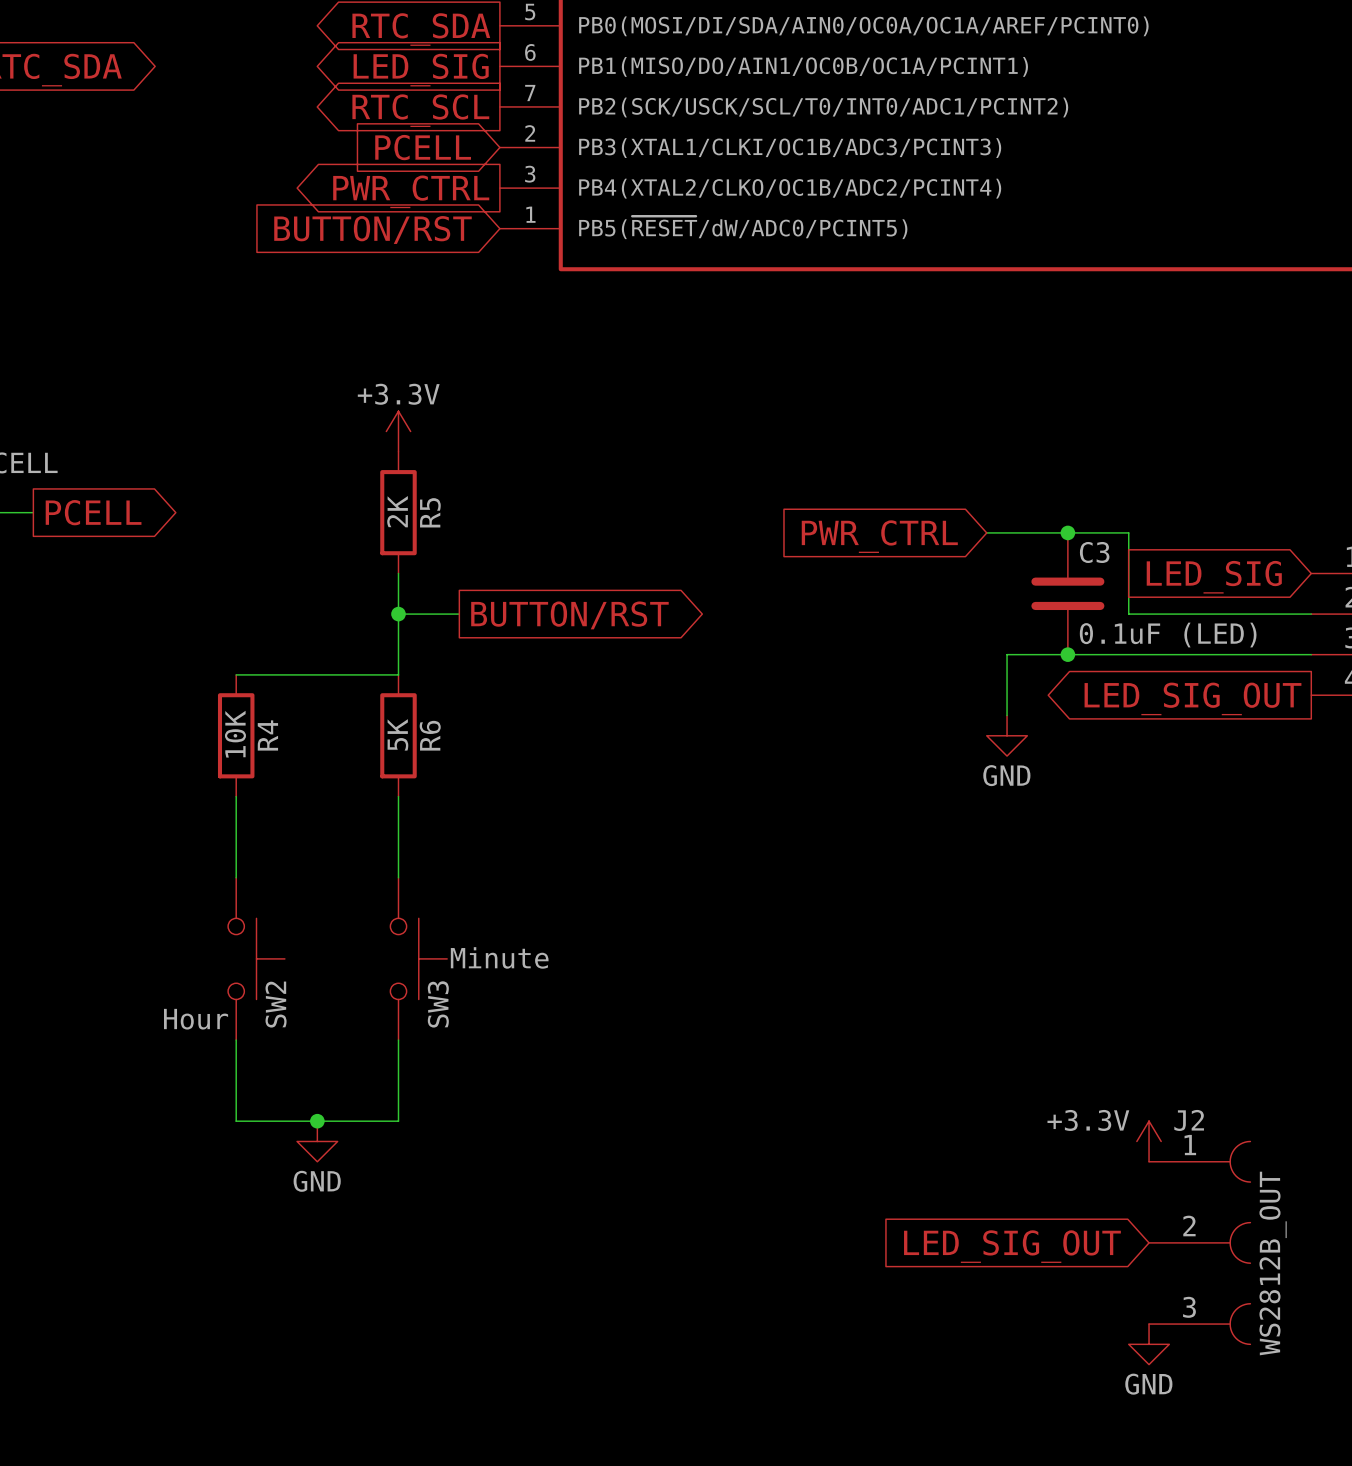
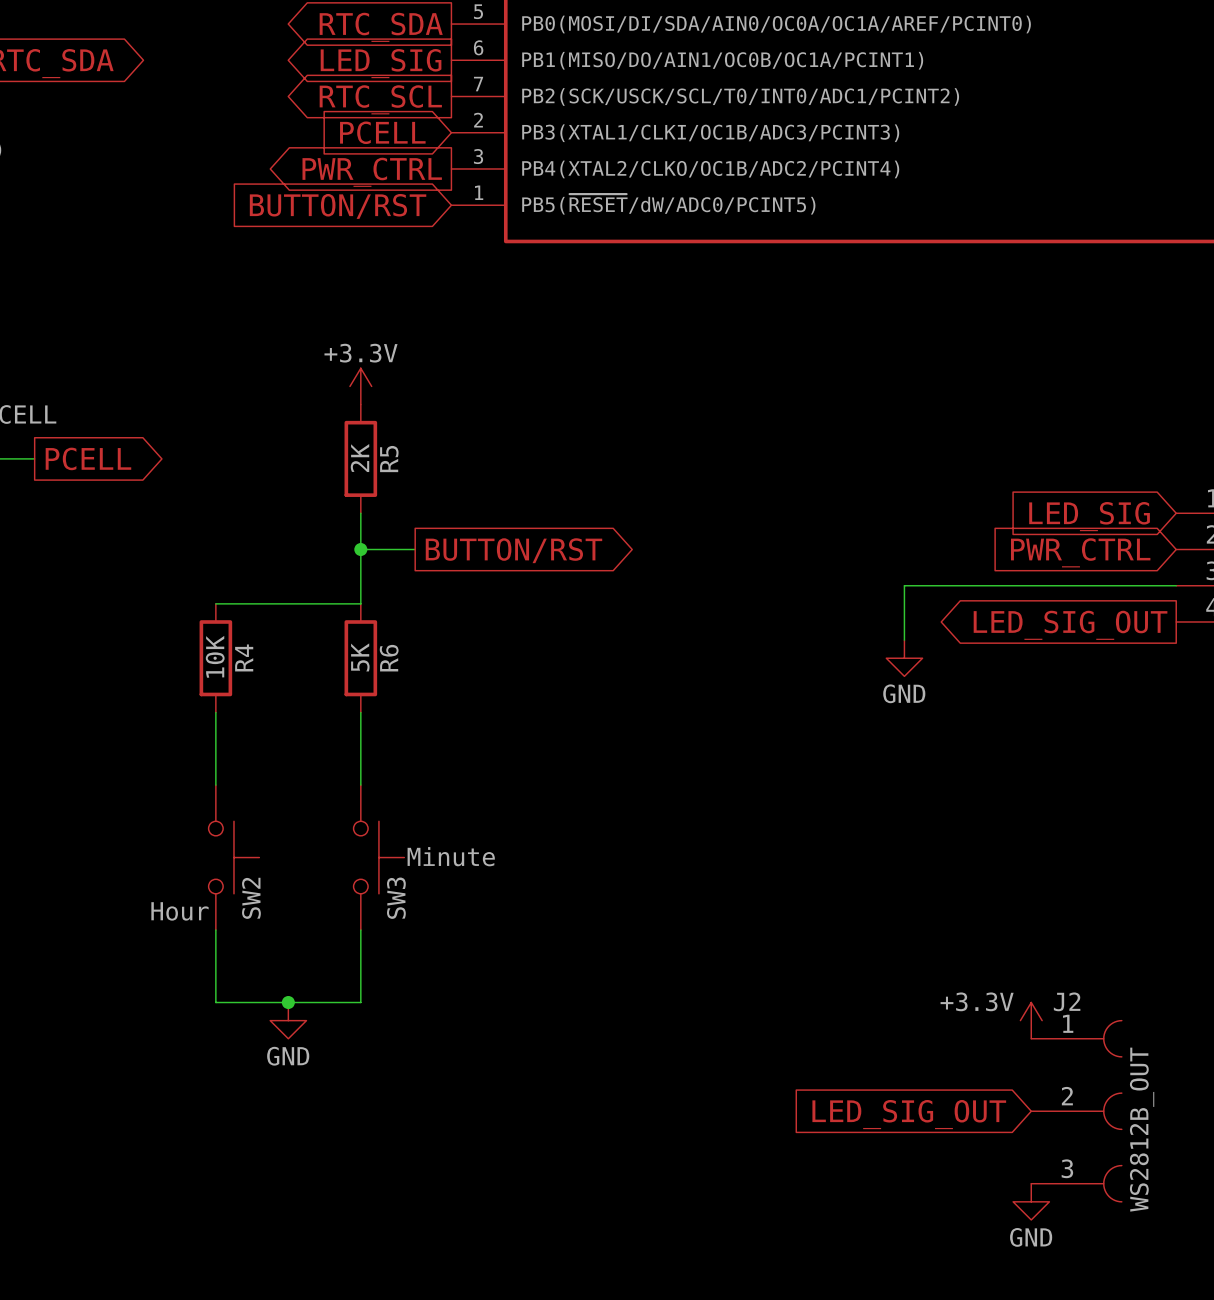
wire: (986, 532) (1128, 532) (1128, 614) (1311, 614) -> none
junction: (1067, 532) -> none
global label position: PWR_CTRL (879, 536) -> PWR_CTRL (1080, 552)
C3: 0.1uF (LED) (1067, 593) -> none
junction: (1067, 654) -> none

